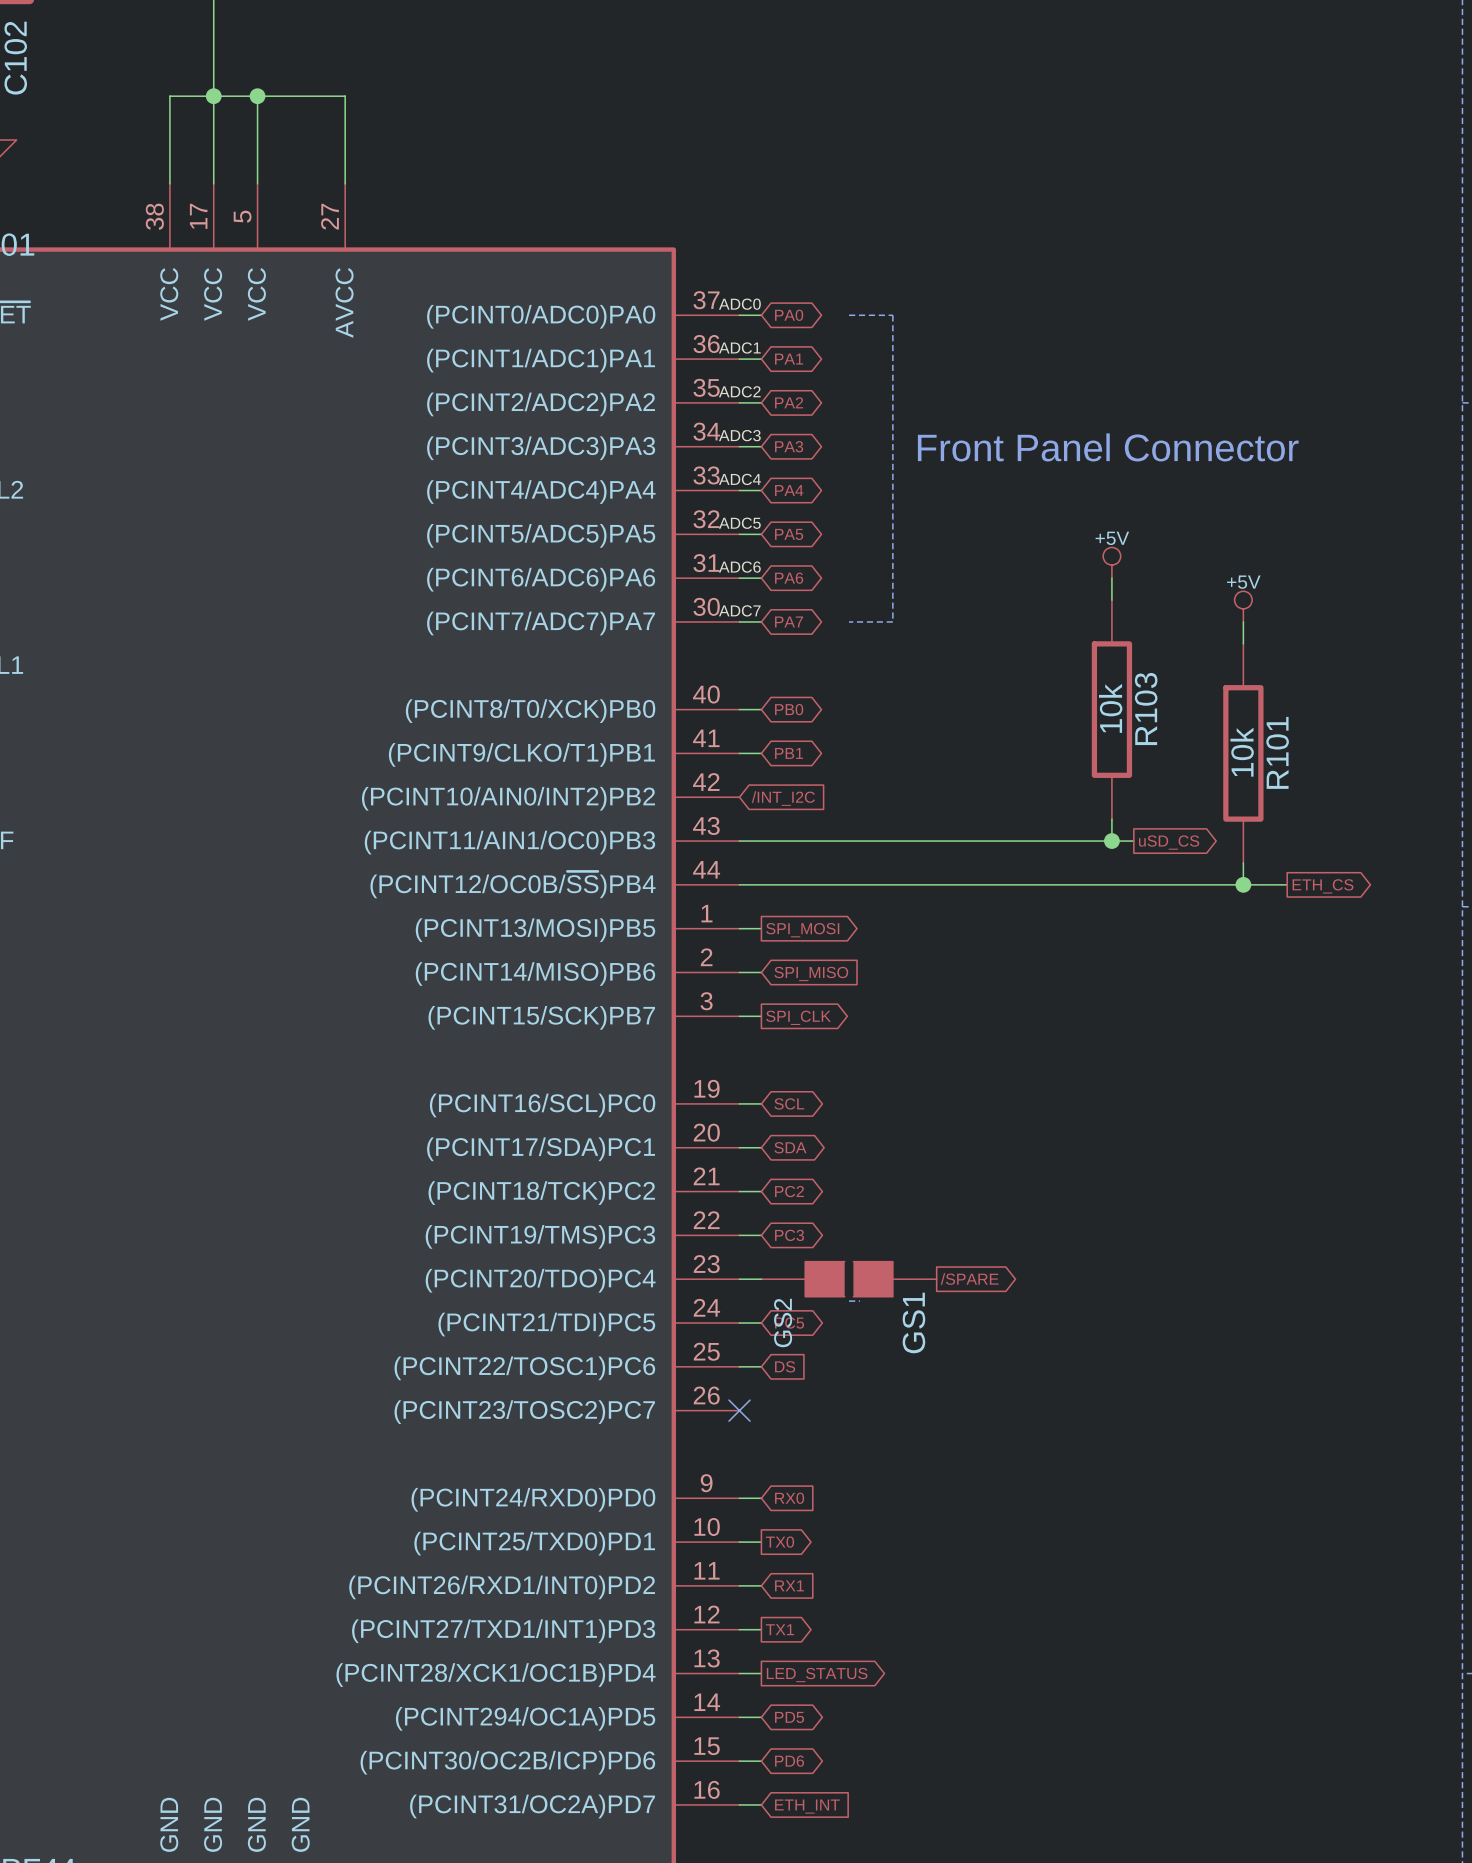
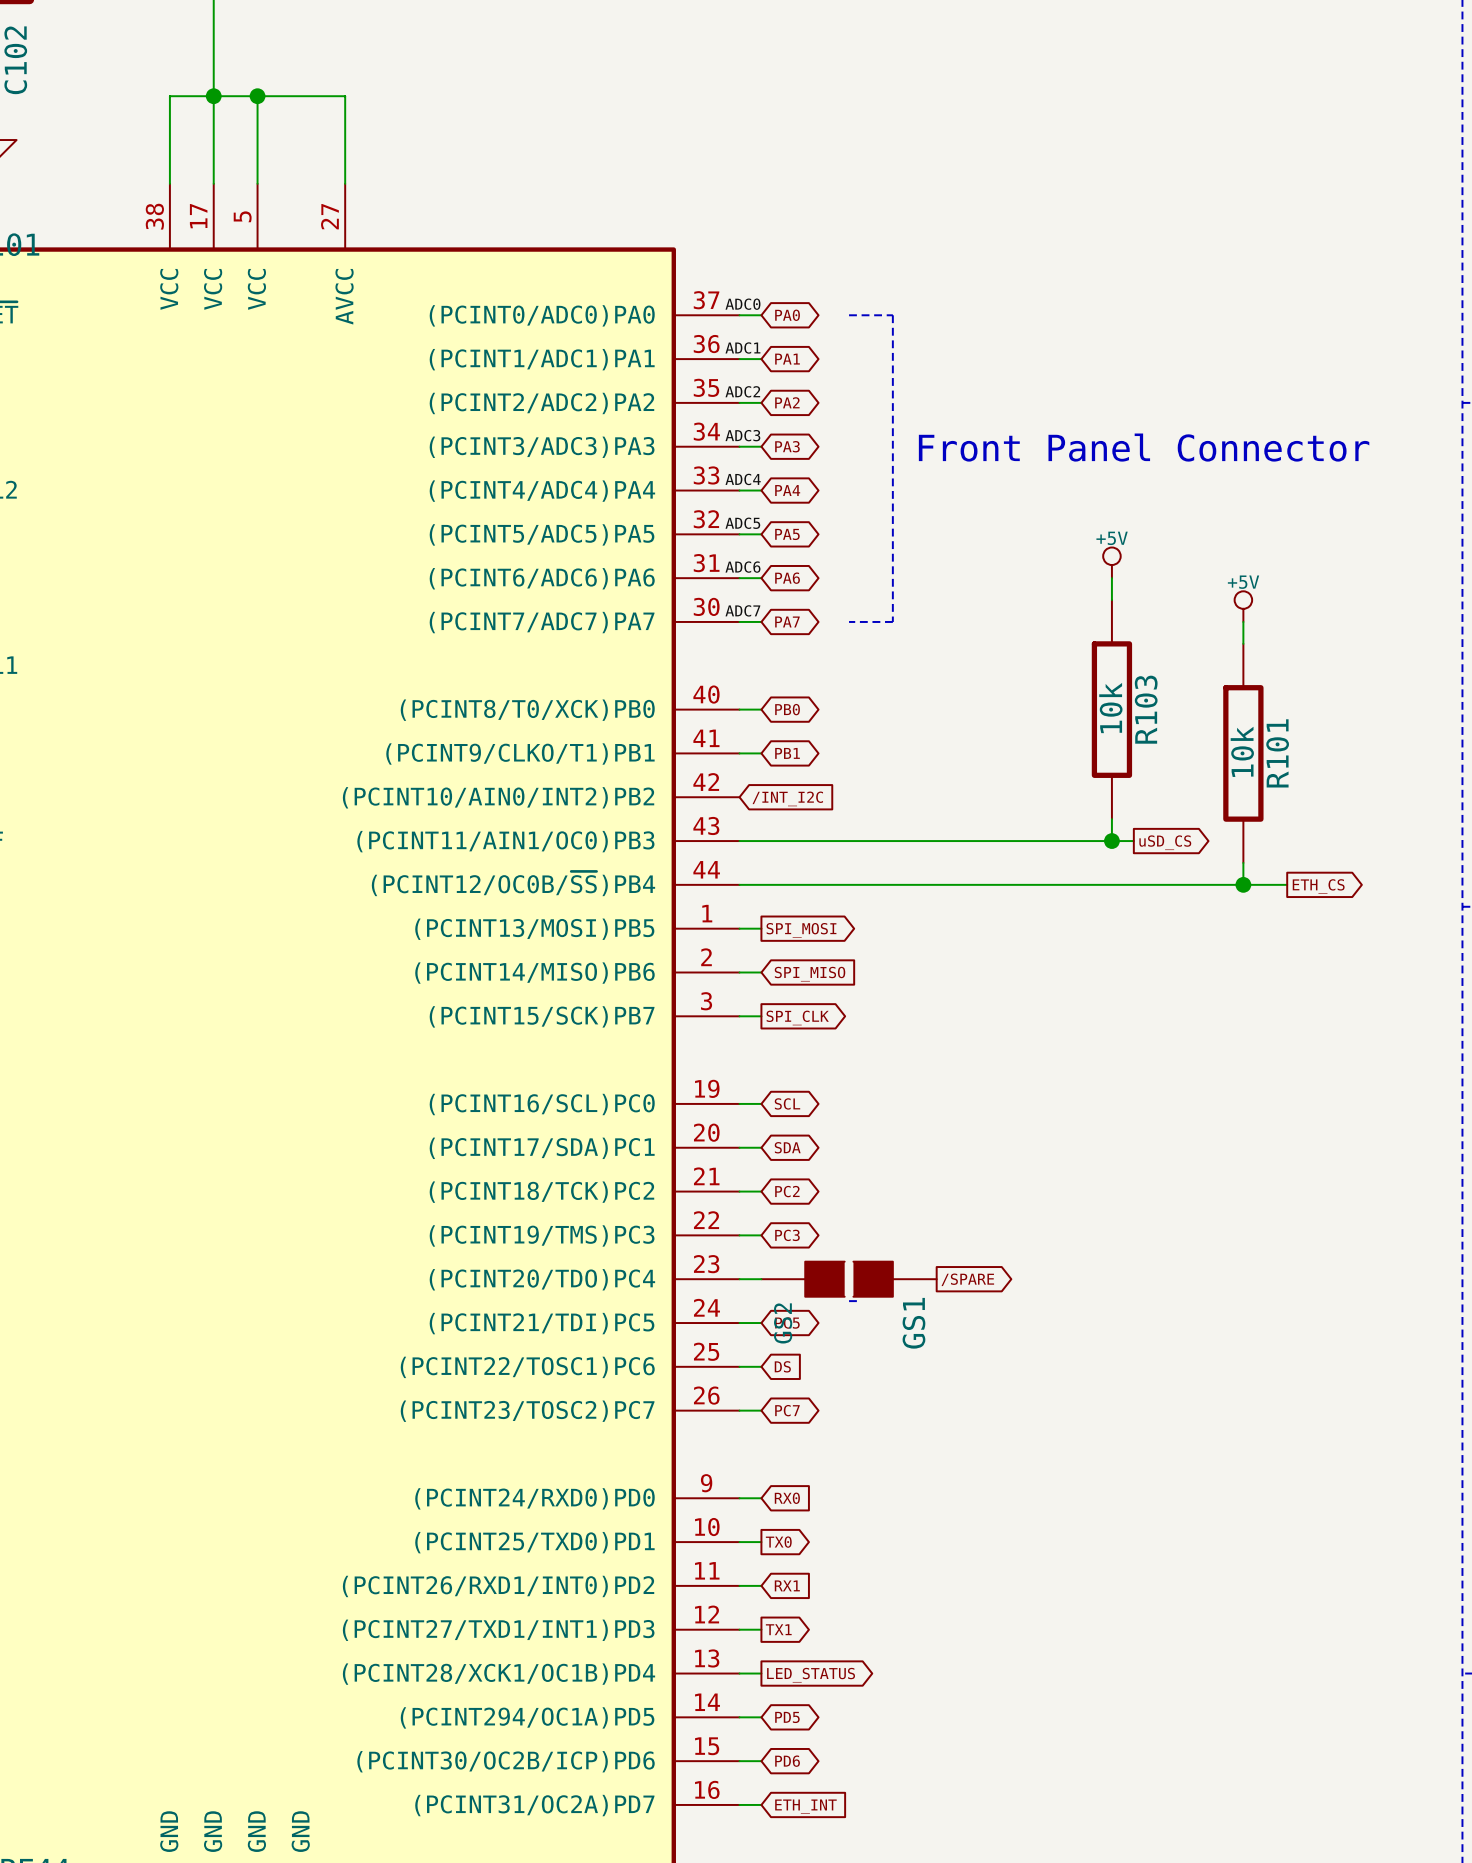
wire: none -> (739, 1410) (761, 1410)
no-connect mark: (739, 1410) -> none
global label: none -> PC7 (787, 1410)

